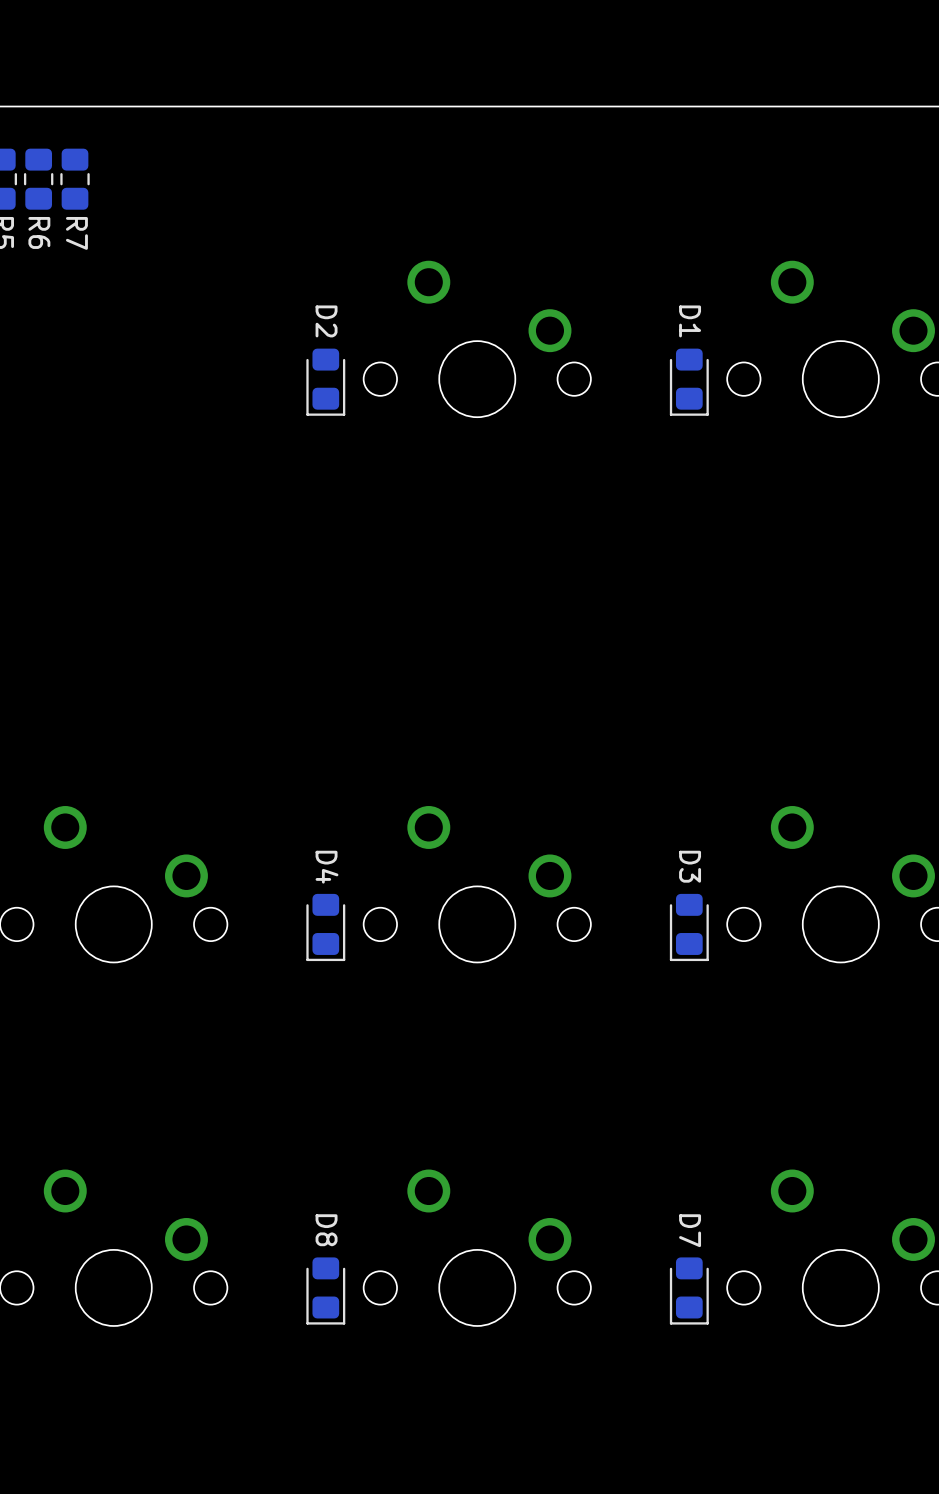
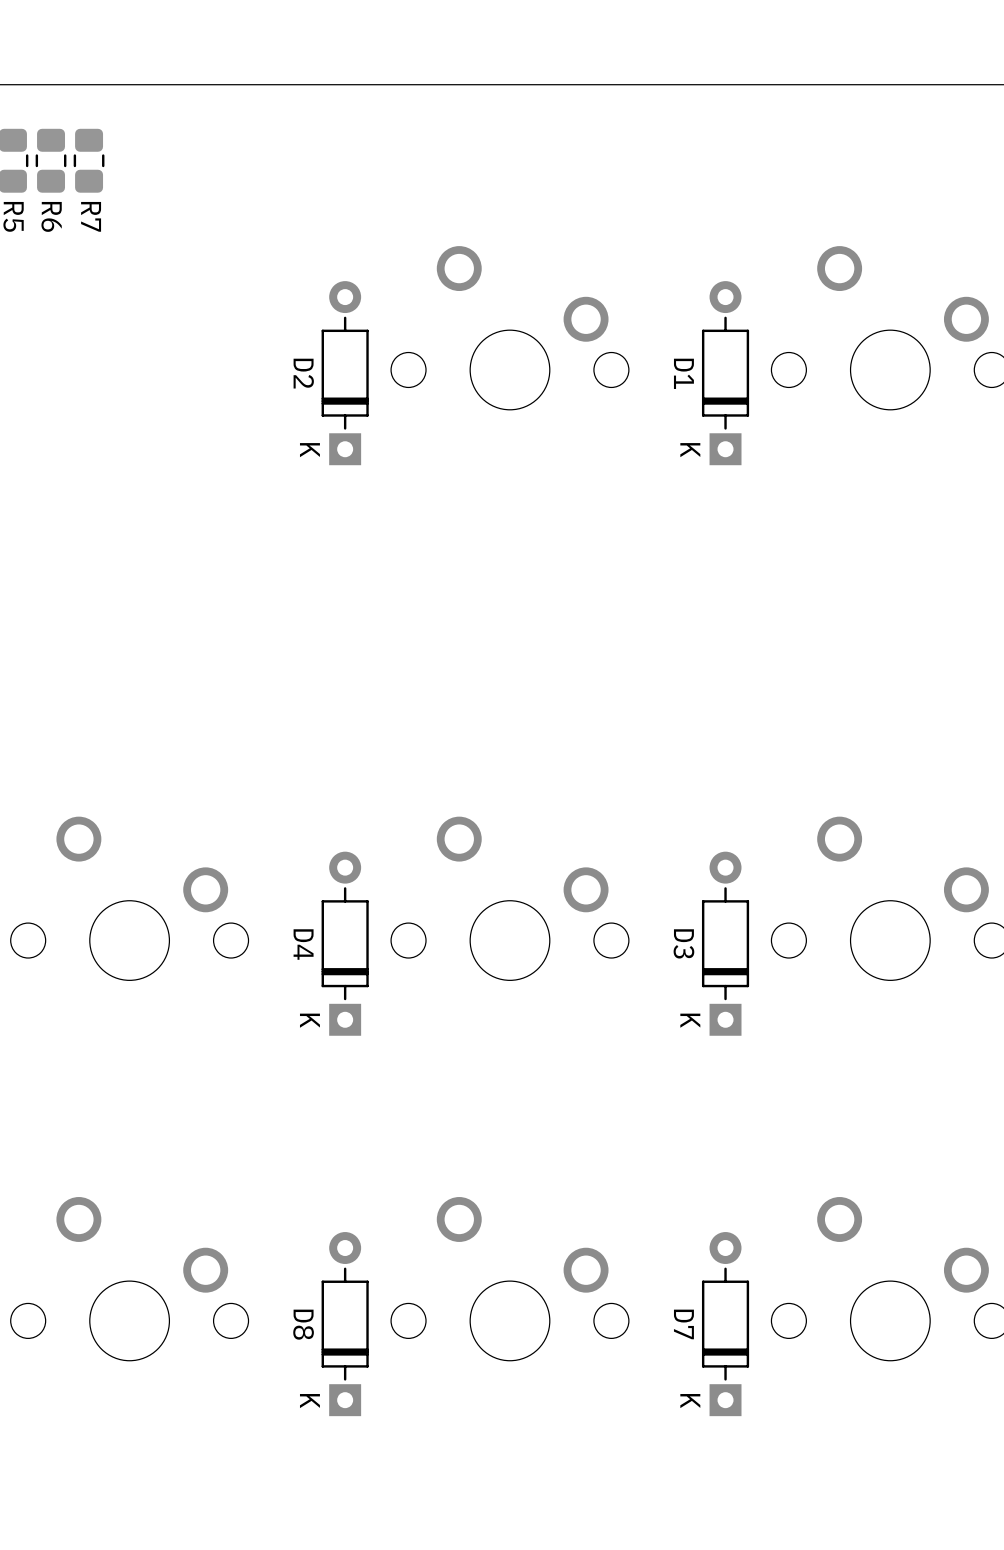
D2 name position: D2 (326, 321) -> D2 (303, 373)
D1 name position: D1 (690, 321) -> D1 (683, 373)
D2 footprint: [306, 348, 346, 416] -> [321, 281, 369, 466]
D1 footprint: [669, 348, 709, 416] -> [701, 281, 750, 466]
D3 name position: D3 (690, 866) -> D3 (683, 943)
D4 name position: D4 (327, 867) -> D4 (303, 944)
D4 footprint: [306, 893, 346, 962] -> [321, 851, 369, 1036]
D3 footprint: [669, 893, 709, 962] -> [701, 851, 750, 1036]
D8 name position: D8 (326, 1230) -> D8 (303, 1324)
D7 name position: D7 (690, 1230) -> D7 (683, 1324)
D8 footprint: [306, 1257, 346, 1325] -> [321, 1232, 369, 1417]
D7 footprint: [669, 1257, 709, 1325] -> [701, 1232, 750, 1417]

